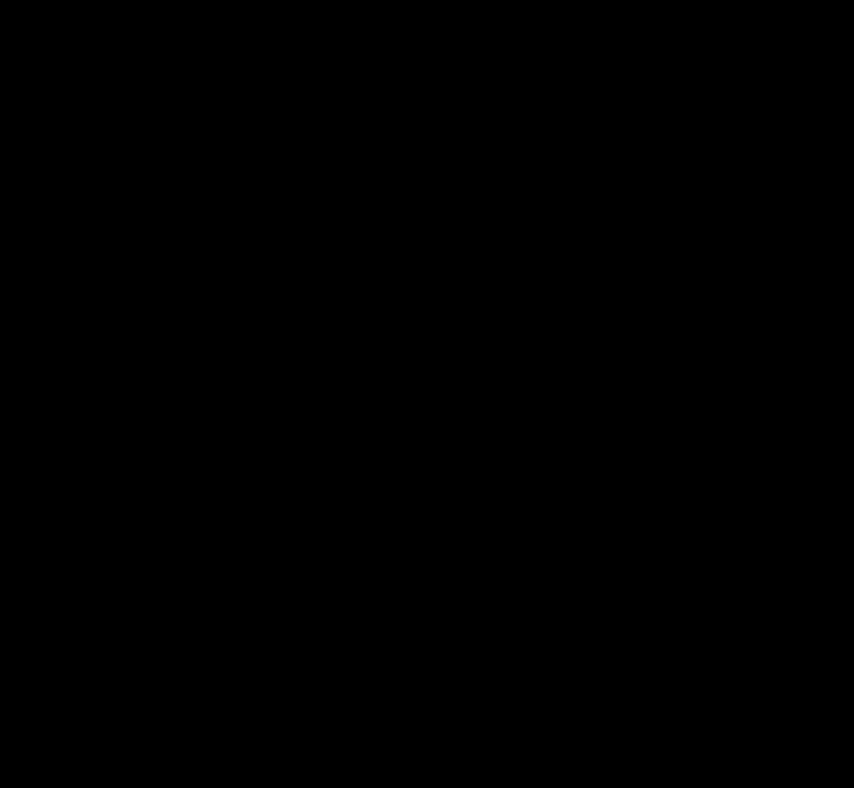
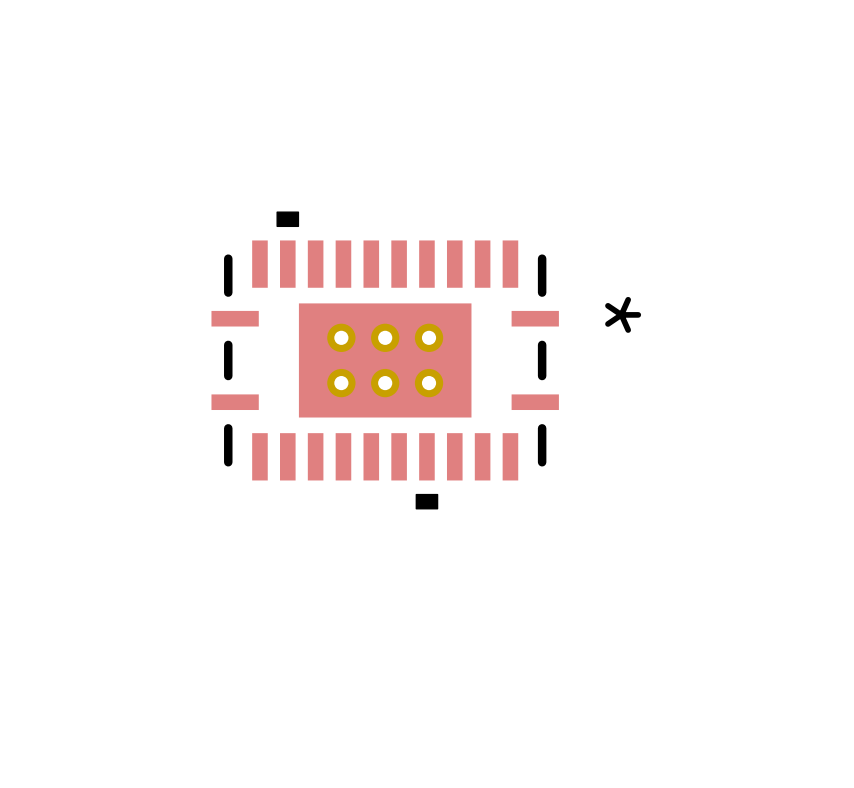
part: none -> (385, 360)

